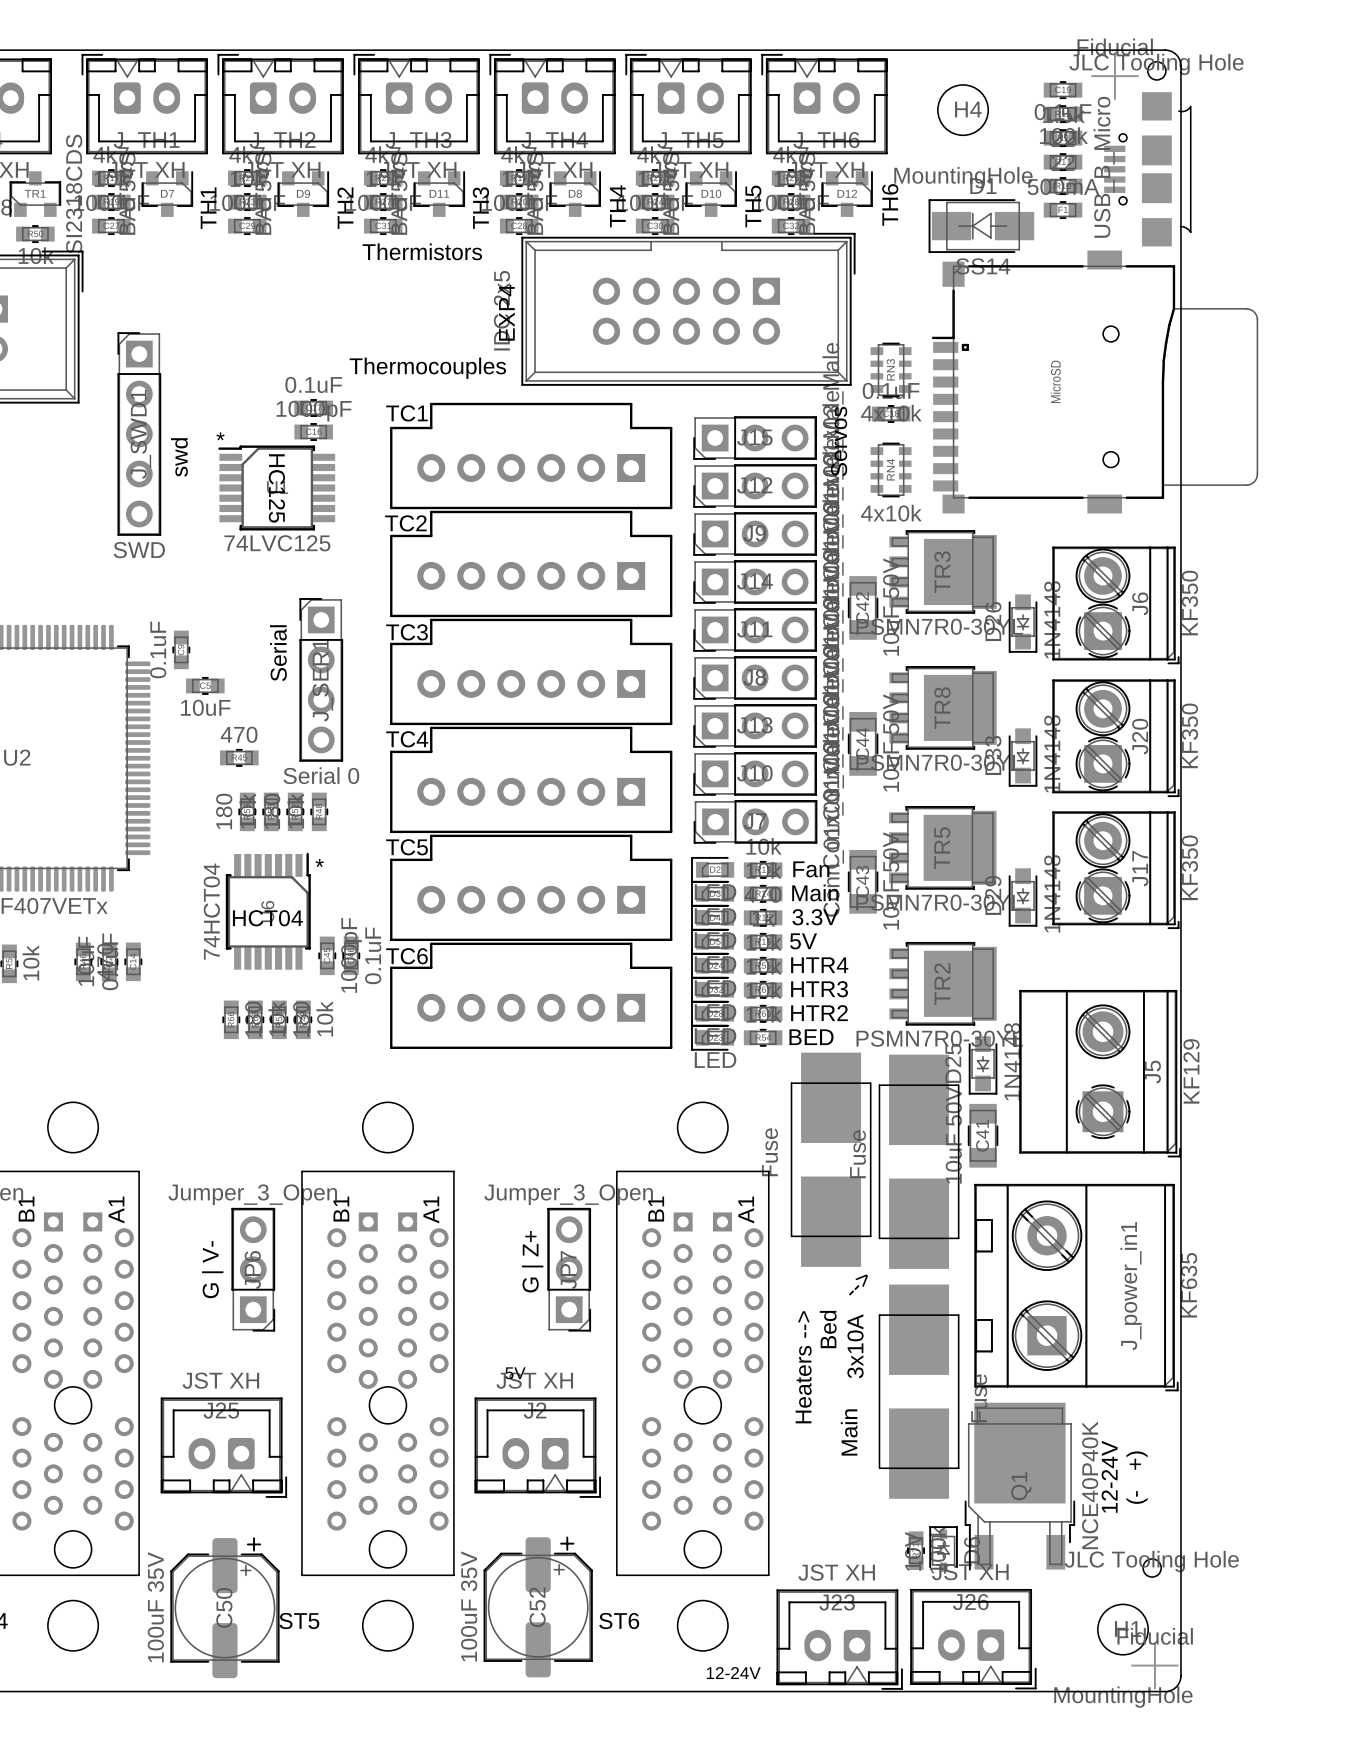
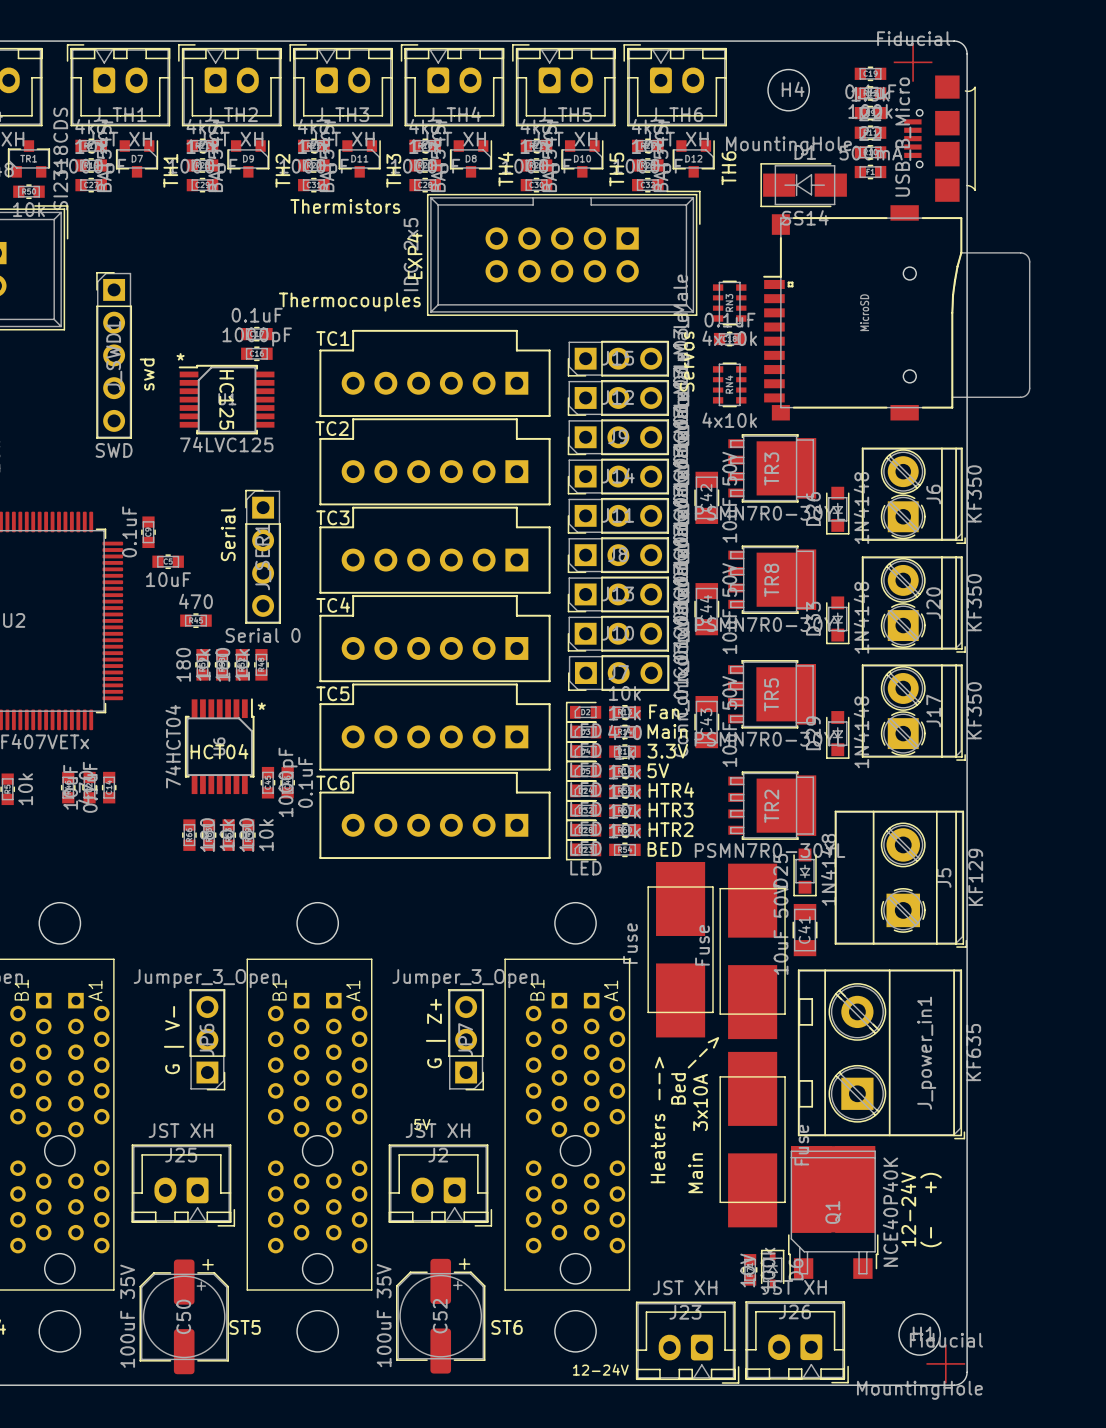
part: JLC Tooling Hole (1156, 70) -> none
Q1 footprint: [964, 1402, 1076, 1571] -> [788, 1146, 879, 1280]
part: JLC Tooling Hole (1152, 1568) -> none

